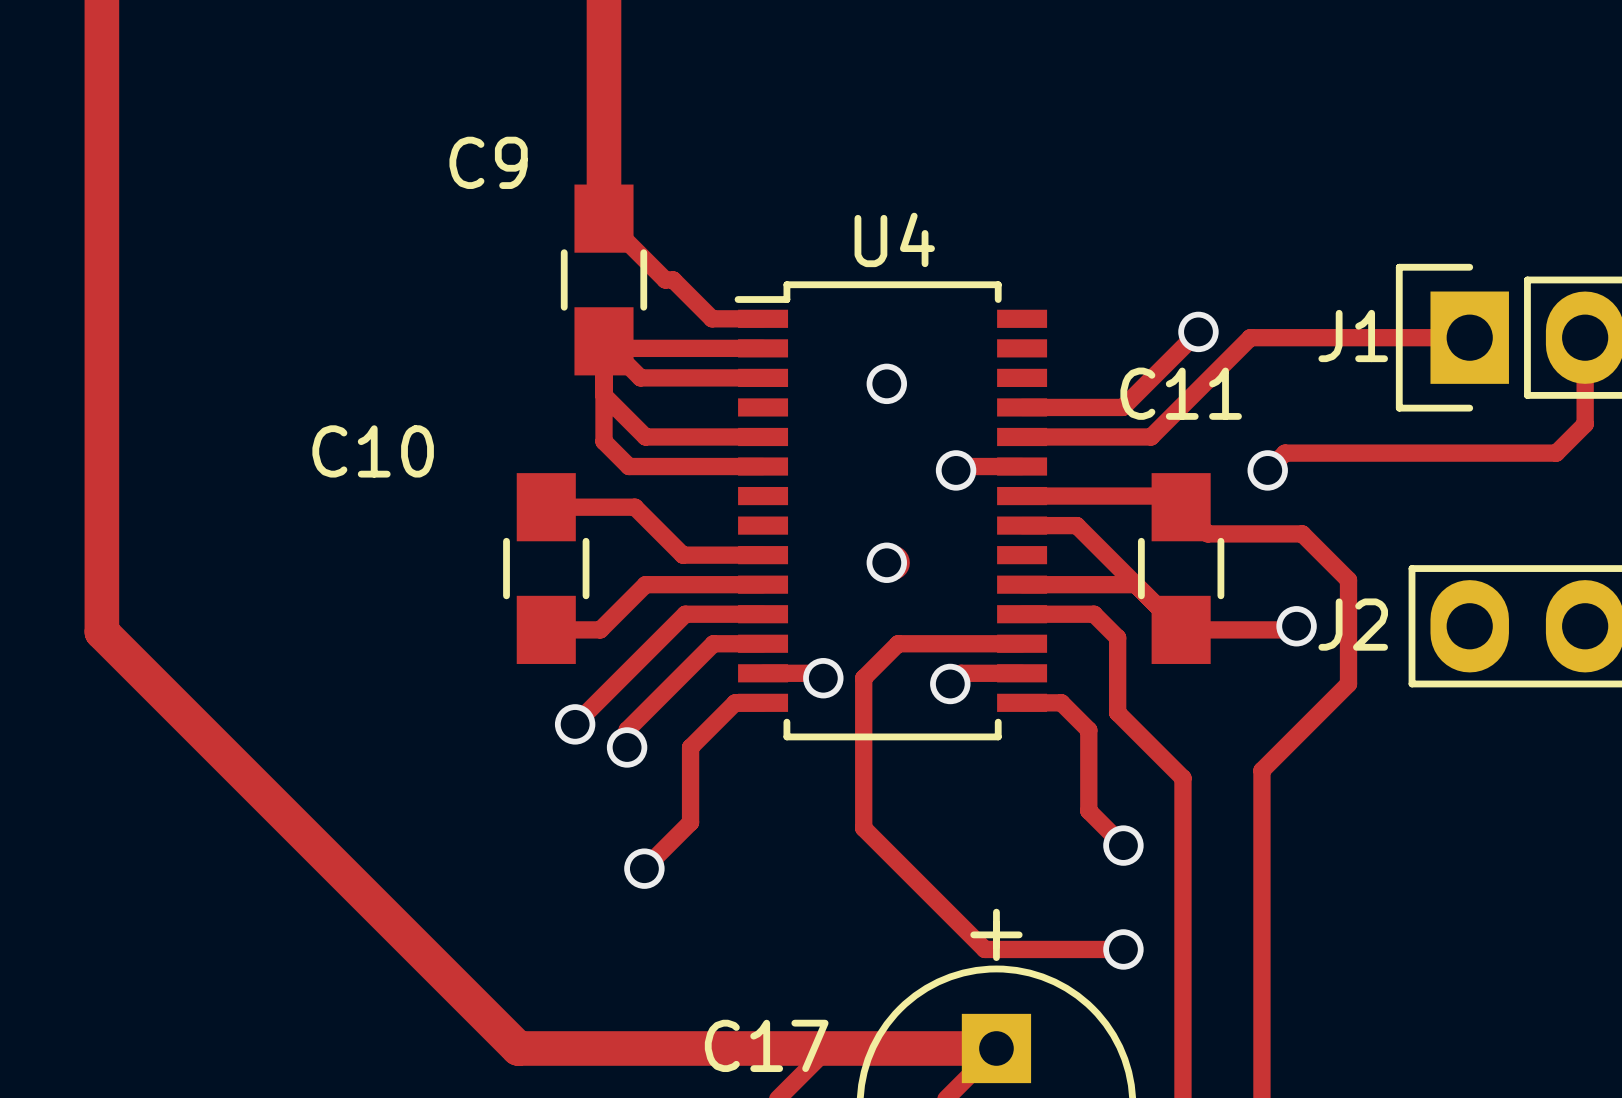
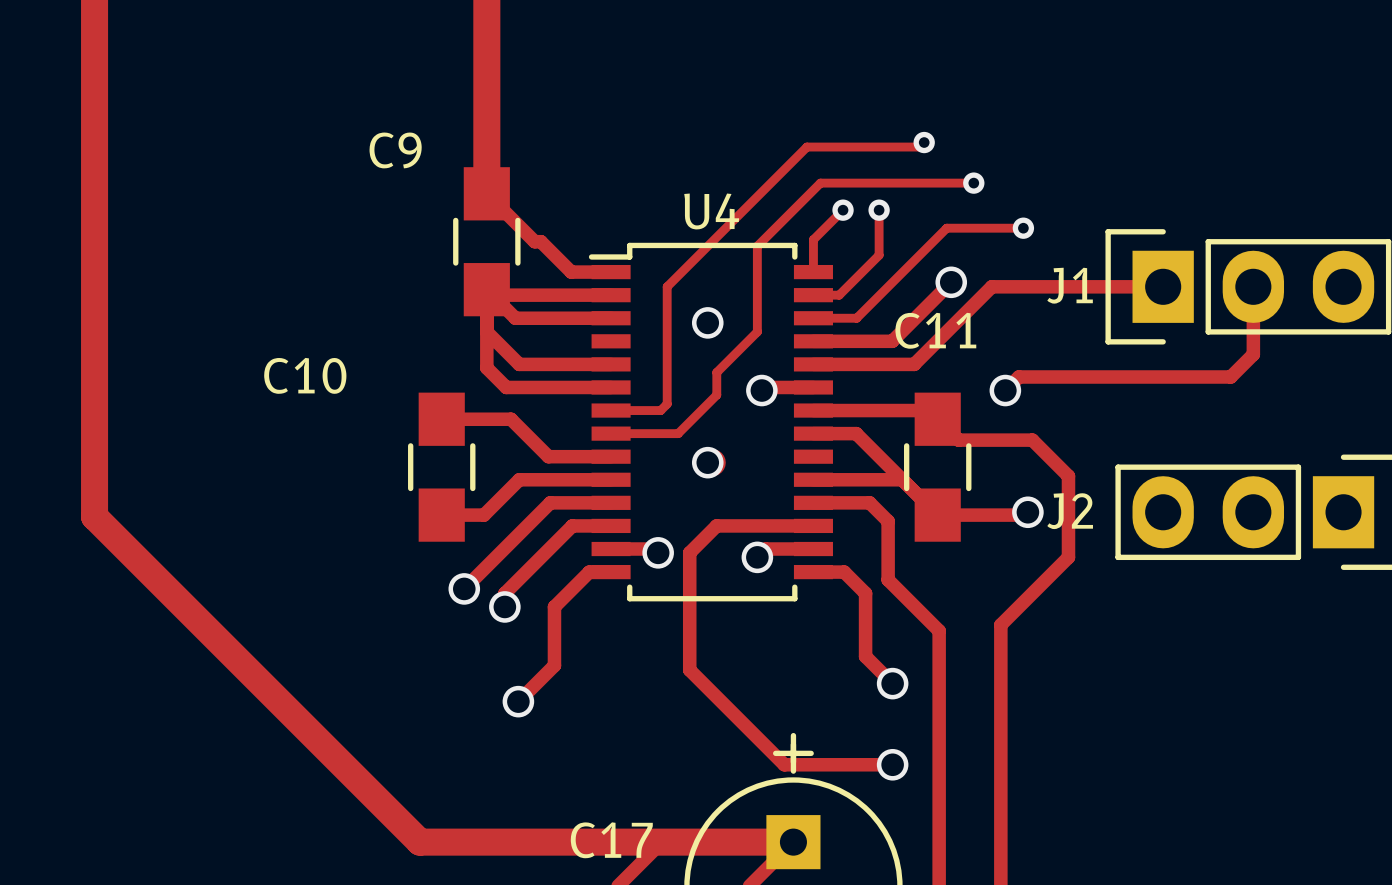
track: none -> (924, 142) (919, 147) (806, 147) (667, 286) (667, 404) (660, 410) (611, 410)
via: none -> (924, 142)
track: none -> (973, 183) (820, 183) (757, 246) (757, 331) (716, 372) (716, 395) (678, 433) (611, 433)
via: none -> (973, 183)
track: none -> (843, 210) (813, 239) (813, 272)
via: none -> (843, 210)
track: none -> (879, 210) (879, 255) (839, 295) (813, 295)
via: none -> (879, 210)
track: none -> (1023, 228) (946, 228) (856, 318) (813, 318)
via: none -> (1023, 228)

